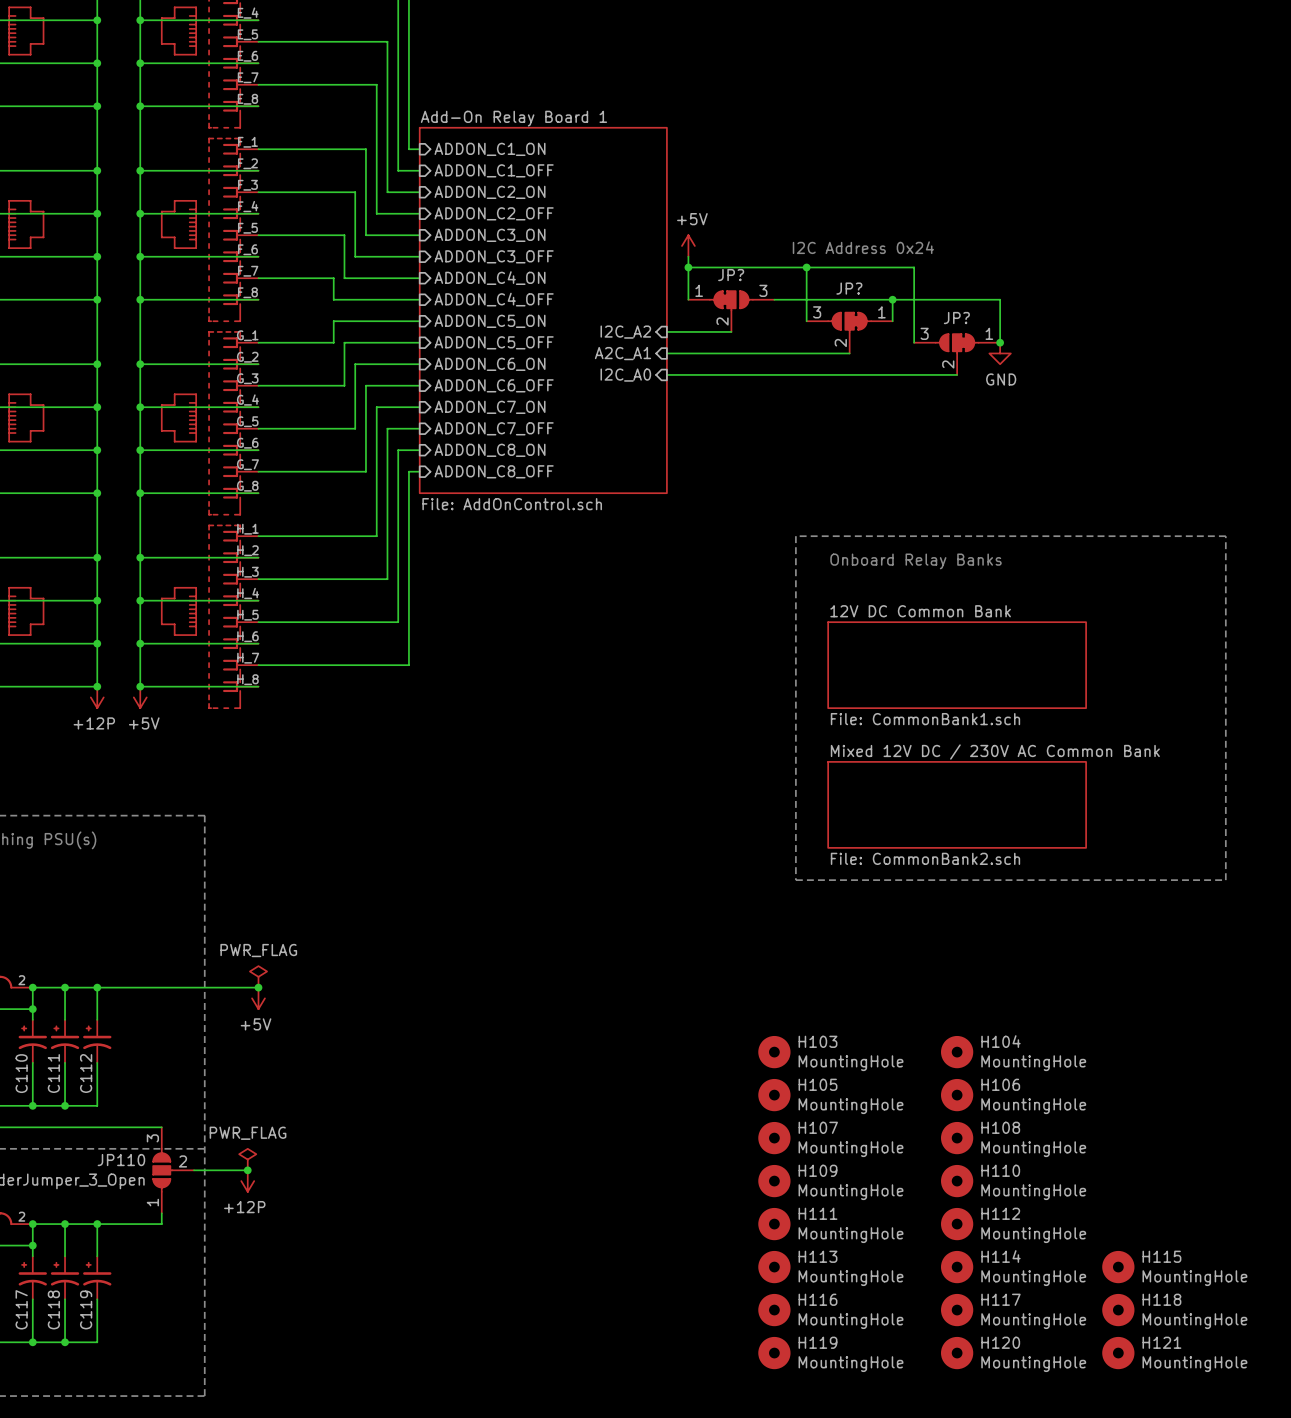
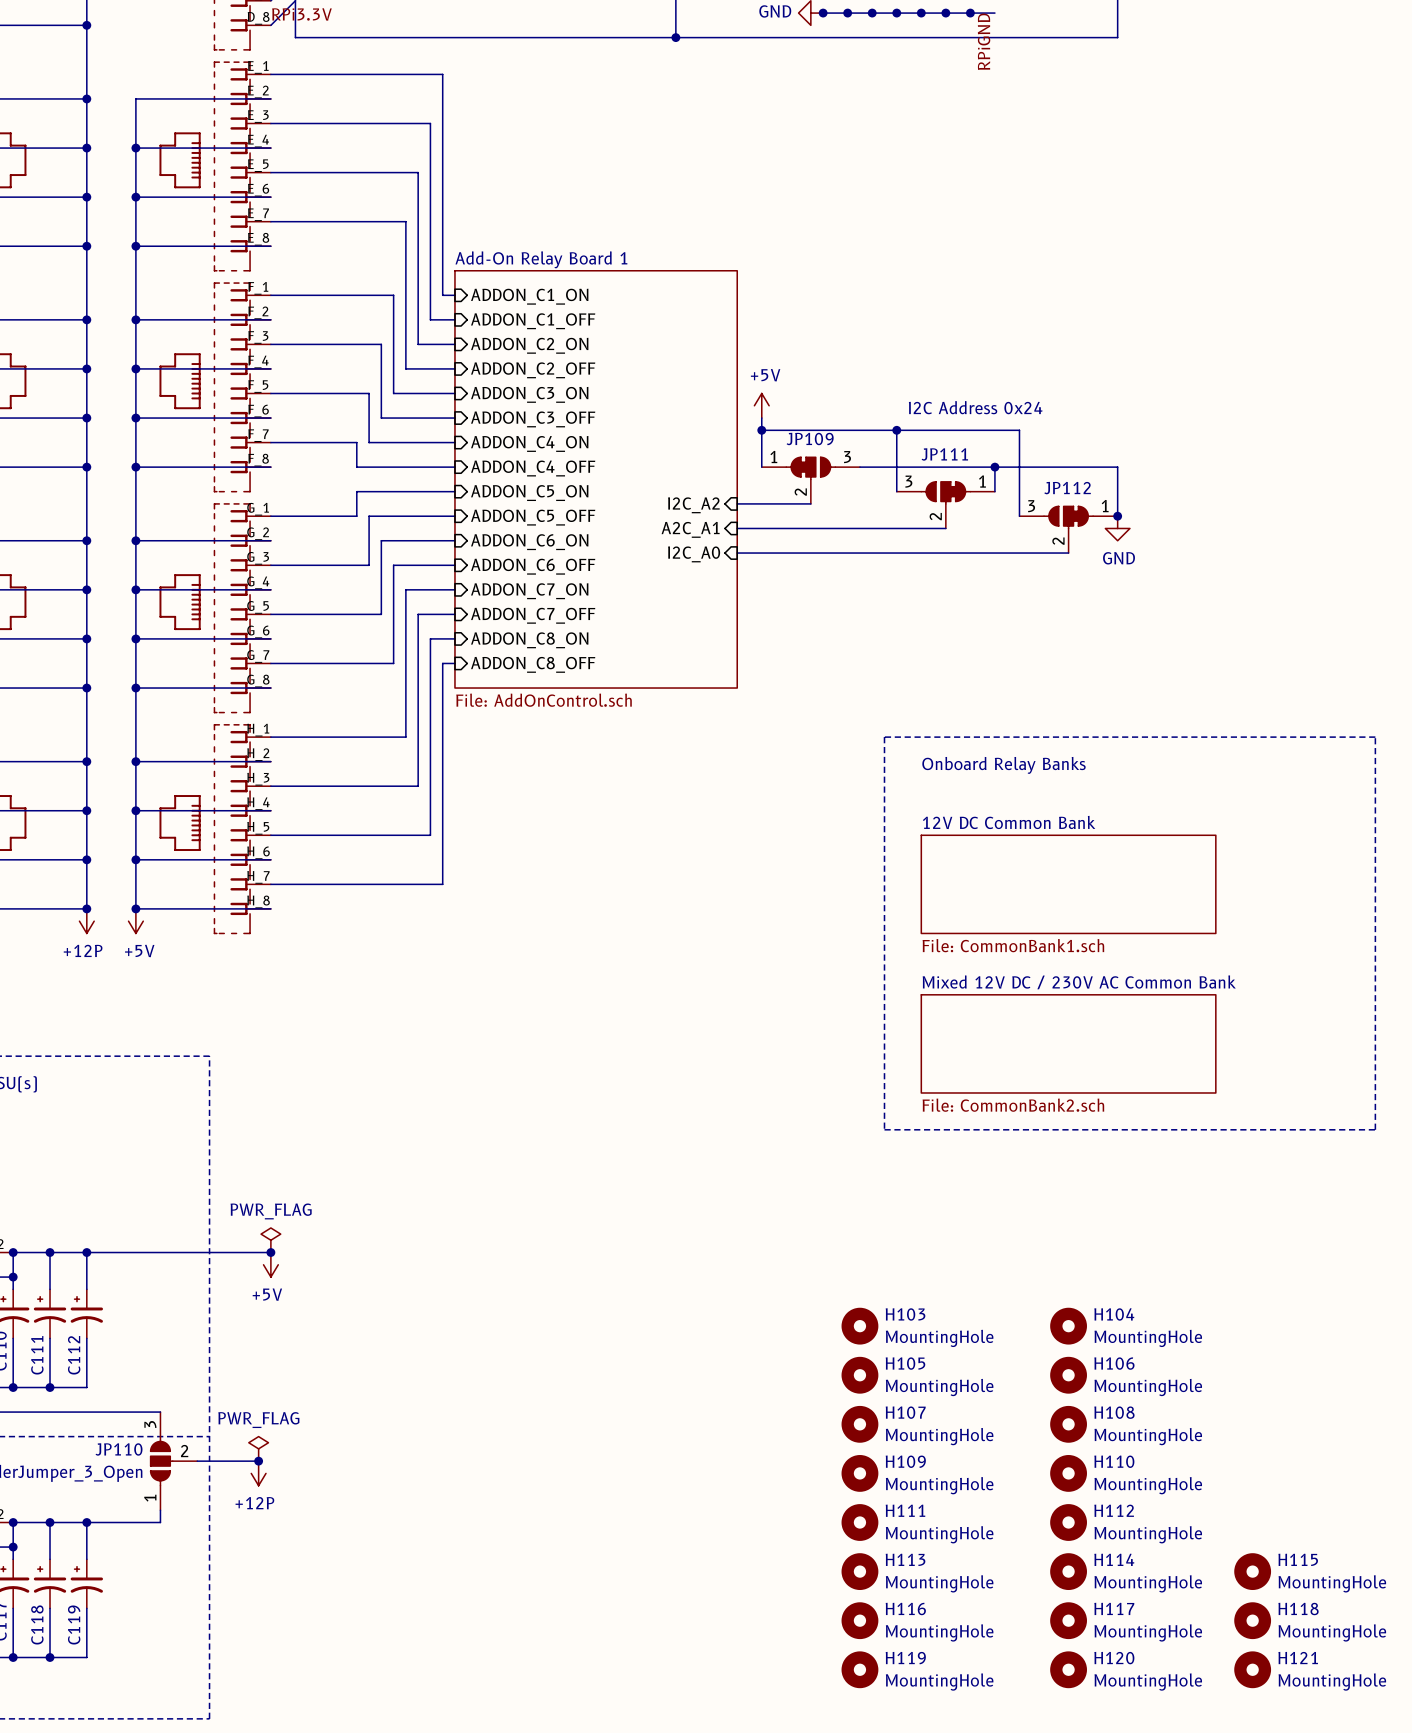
JP? name: JP? (731, 275) -> JP109 (810, 438)
JP? name: JP? (849, 288) -> JP111 (944, 454)
JP? name: JP? (956, 318) -> JP112 (1067, 488)

